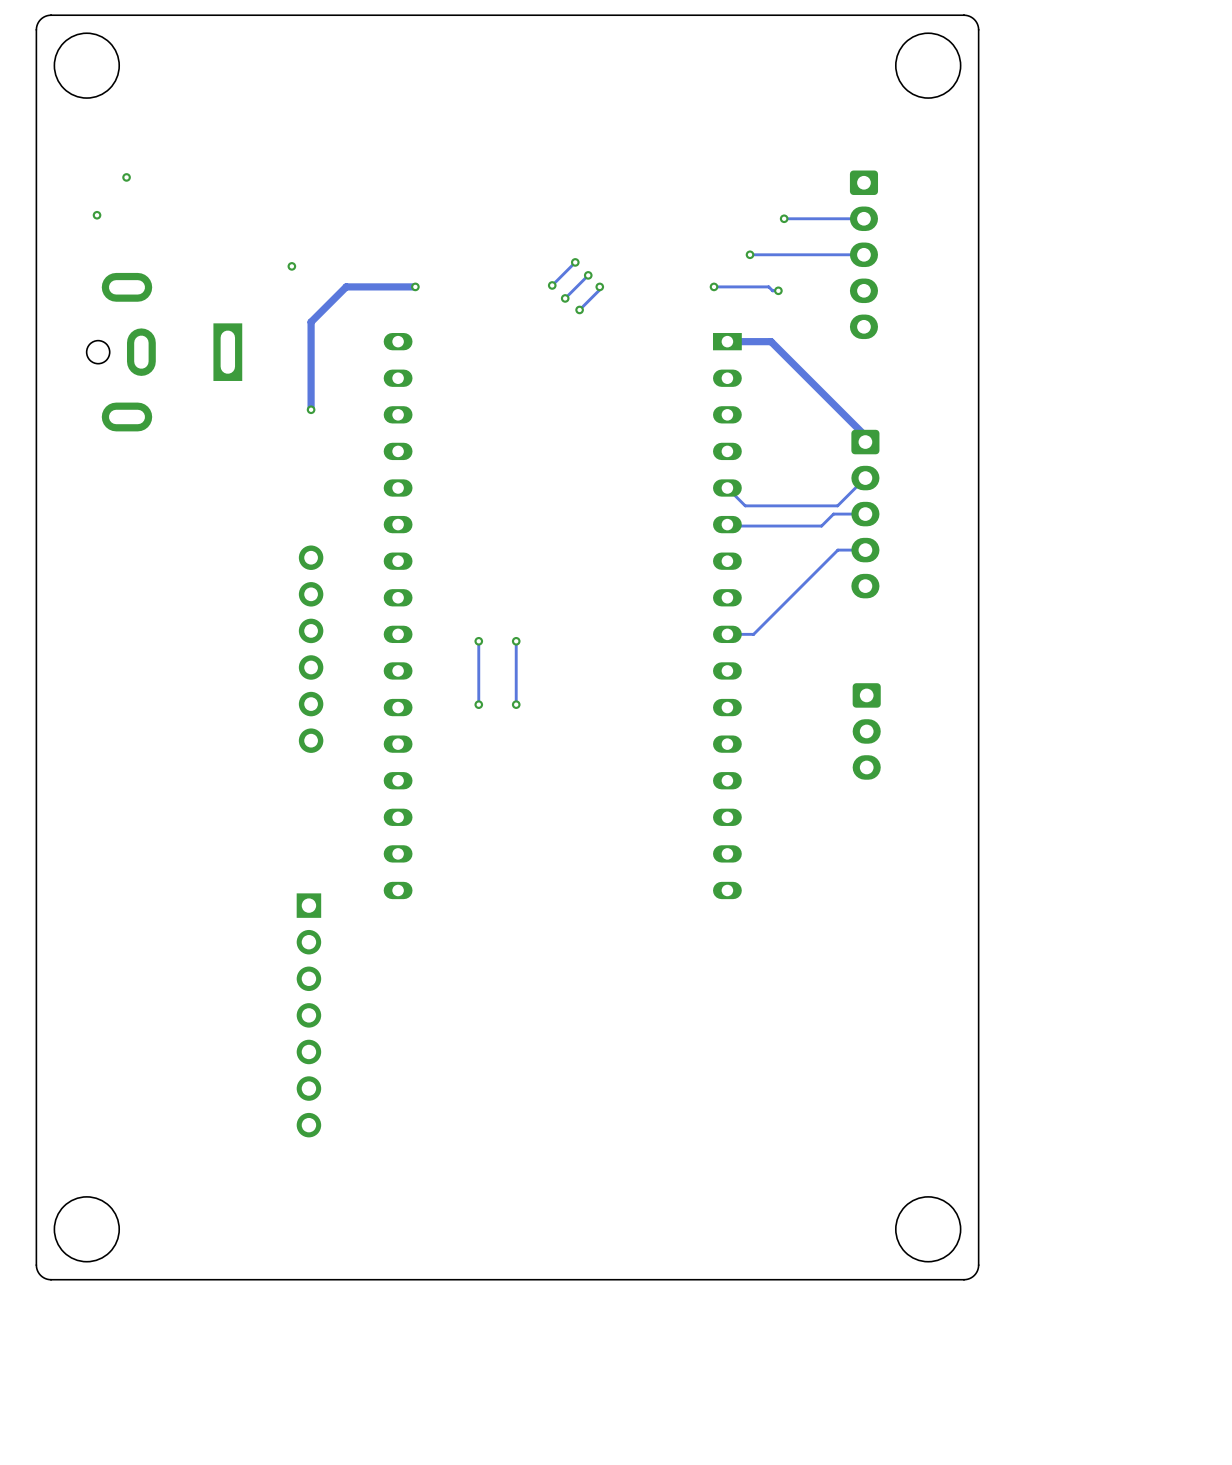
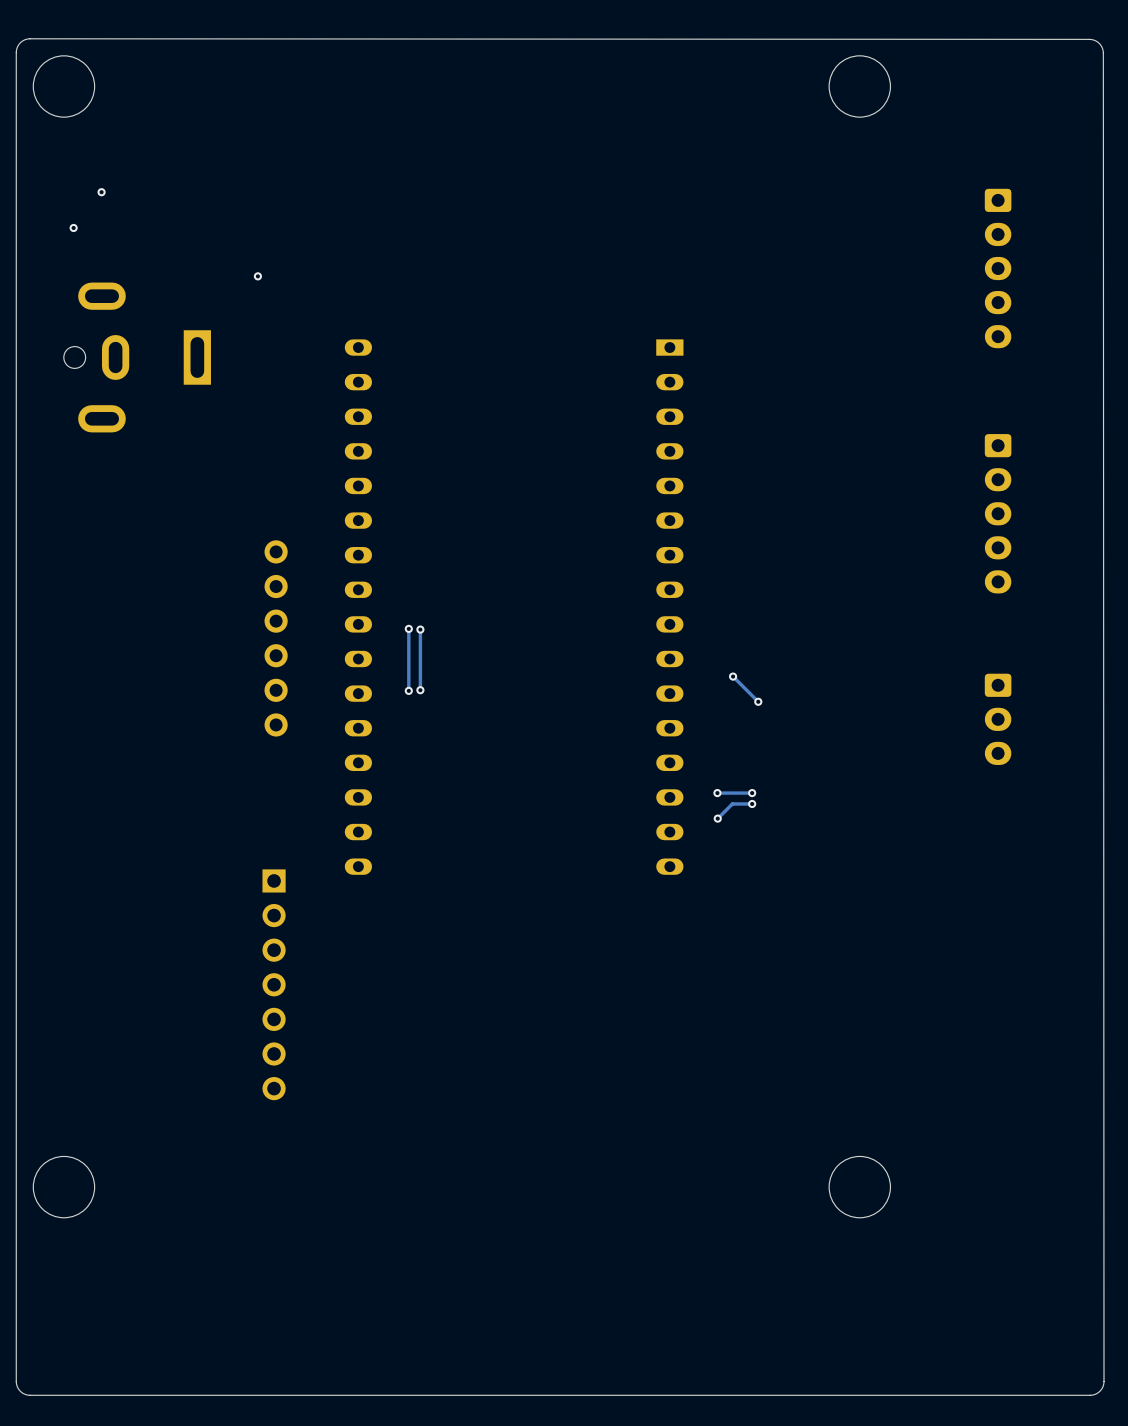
board edge: (51, 15) (964, 15) (975, 20) (978, 29) (978, 1265) (974, 1275) (964, 1279) (51, 1279) (40, 1275) (36, 1265) -> (30, 38) (1089, 39) (1100, 44) (1103, 53) (1103, 1383) (1098, 1392) (1090, 1395) (28, 1395) (20, 1391) (16, 1383) (16, 1220)
via: (784, 218) -> none
track: (863, 218) (782, 218) -> none
via: (750, 254) -> none
track: (863, 254) (749, 255) -> none
part: (863, 254) -> none
part: none -> (998, 268)
track: (575, 262) (552, 285) -> none
via: (575, 262) -> none
track: (588, 275) (565, 298) -> none
via: (588, 275) -> none
via: (552, 285) -> none
track: (415, 286) (346, 286) (311, 322) (311, 409) -> none
via: (415, 286) -> none
track: (599, 286) (599, 289) (579, 309) -> none
via: (599, 286) -> none
track: (714, 286) (768, 286) (772, 290) (778, 290) -> none
via: (714, 286) -> none
via: (778, 290) -> none
via: (565, 298) -> none
via: (579, 309) -> none
track: (727, 341) (771, 341) (865, 436) (865, 442) -> none
via: (311, 409) -> none
track: (865, 478) (837, 505) (745, 505) (727, 488) -> none
track: (865, 514) (833, 514) (821, 526) (728, 526) -> none
part: (865, 514) -> none
part: none -> (998, 513)
track: (865, 550) (837, 550) (753, 634) (727, 634) -> none
track: none -> (408, 628) (408, 690)
via: none -> (408, 628)
track: none -> (420, 629) (420, 690)
via: none -> (420, 629)
track: (478, 641) (478, 707) -> none
via: (478, 641) -> none
track: (516, 641) (516, 704) -> none
via: (516, 641) -> none
track: none -> (731, 675) (758, 701)
via: none -> (733, 676)
via: none -> (420, 690)
via: none -> (408, 690)
via: (478, 704) -> none
via: (516, 704) -> none
via: none -> (758, 701)
part position: (866, 731) -> (998, 719)
via: none -> (717, 793)
via: none -> (752, 793)
track: none -> (753, 793) (717, 793)
via: none -> (752, 803)
track: none -> (753, 803) (732, 803) (717, 818)
via: none -> (717, 818)

